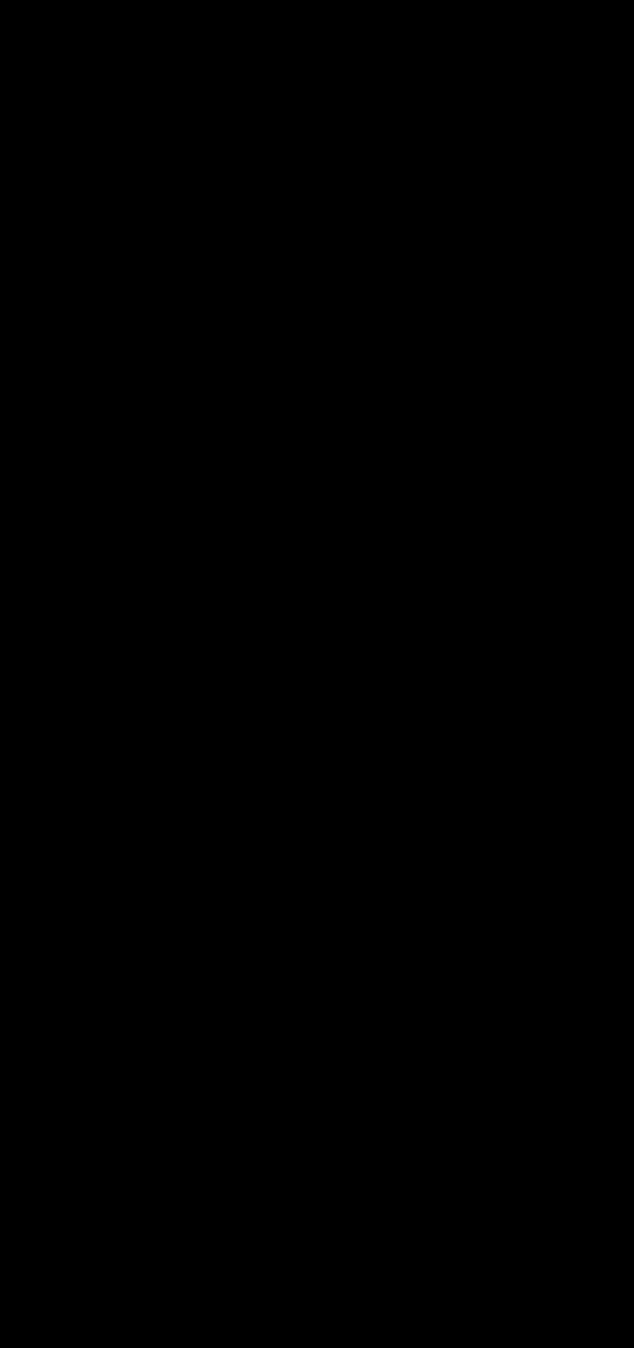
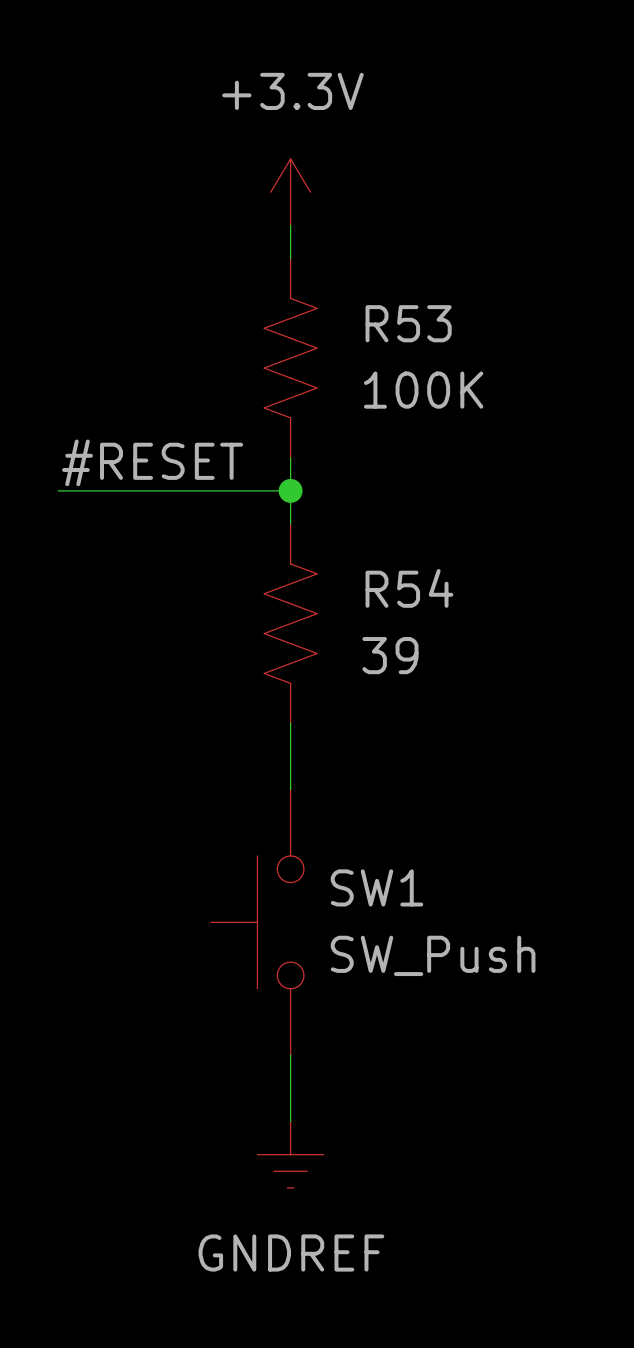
power symbol: none -> +3.3V (290, 192)
wire: none -> (290, 225) (290, 258)
R53: none -> 100K (290, 358)
wire: none -> (290, 457) (290, 524)
label: none -> #RESET (152, 462)
wire: none -> (58, 490) (290, 490)
junction: none -> (290, 490)
R54: none -> 39 (290, 623)
wire: none -> (290, 723) (290, 789)
SW1: none -> SW_Push (257, 922)
wire: none -> (290, 1055) (290, 1121)
power symbol: none -> GNDREF (290, 1154)

